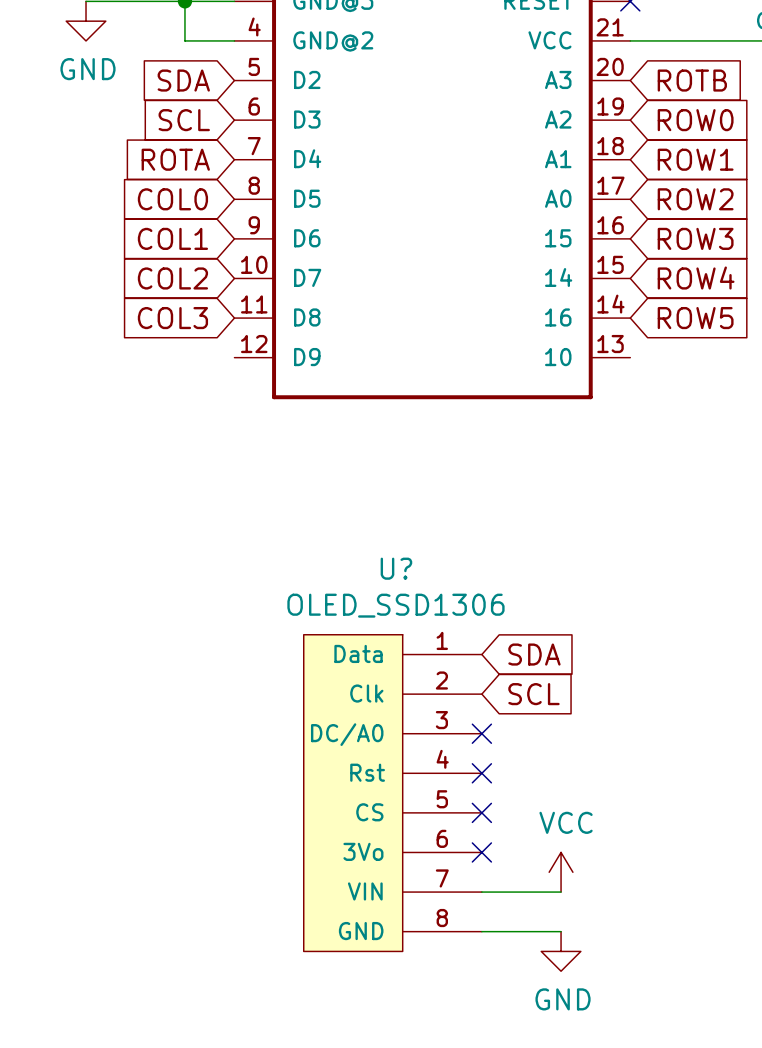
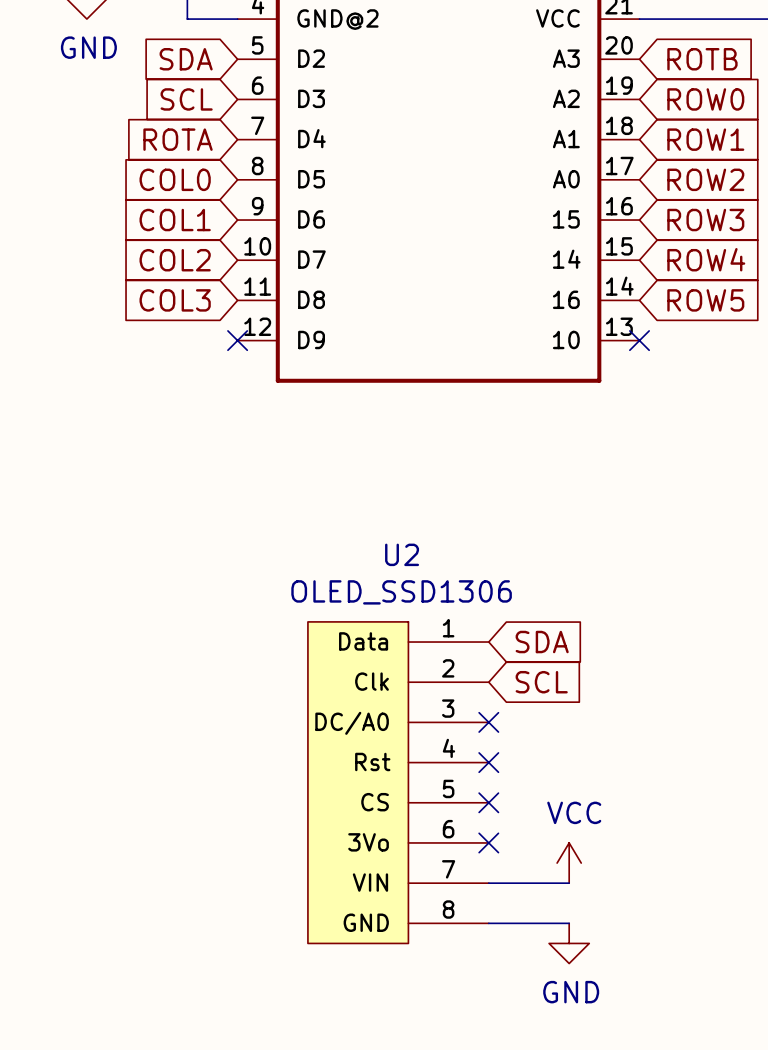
no-connect mark: none -> (237, 340)
no-connect mark: none -> (639, 340)
U? name: U? (396, 568) -> U2 (402, 554)

